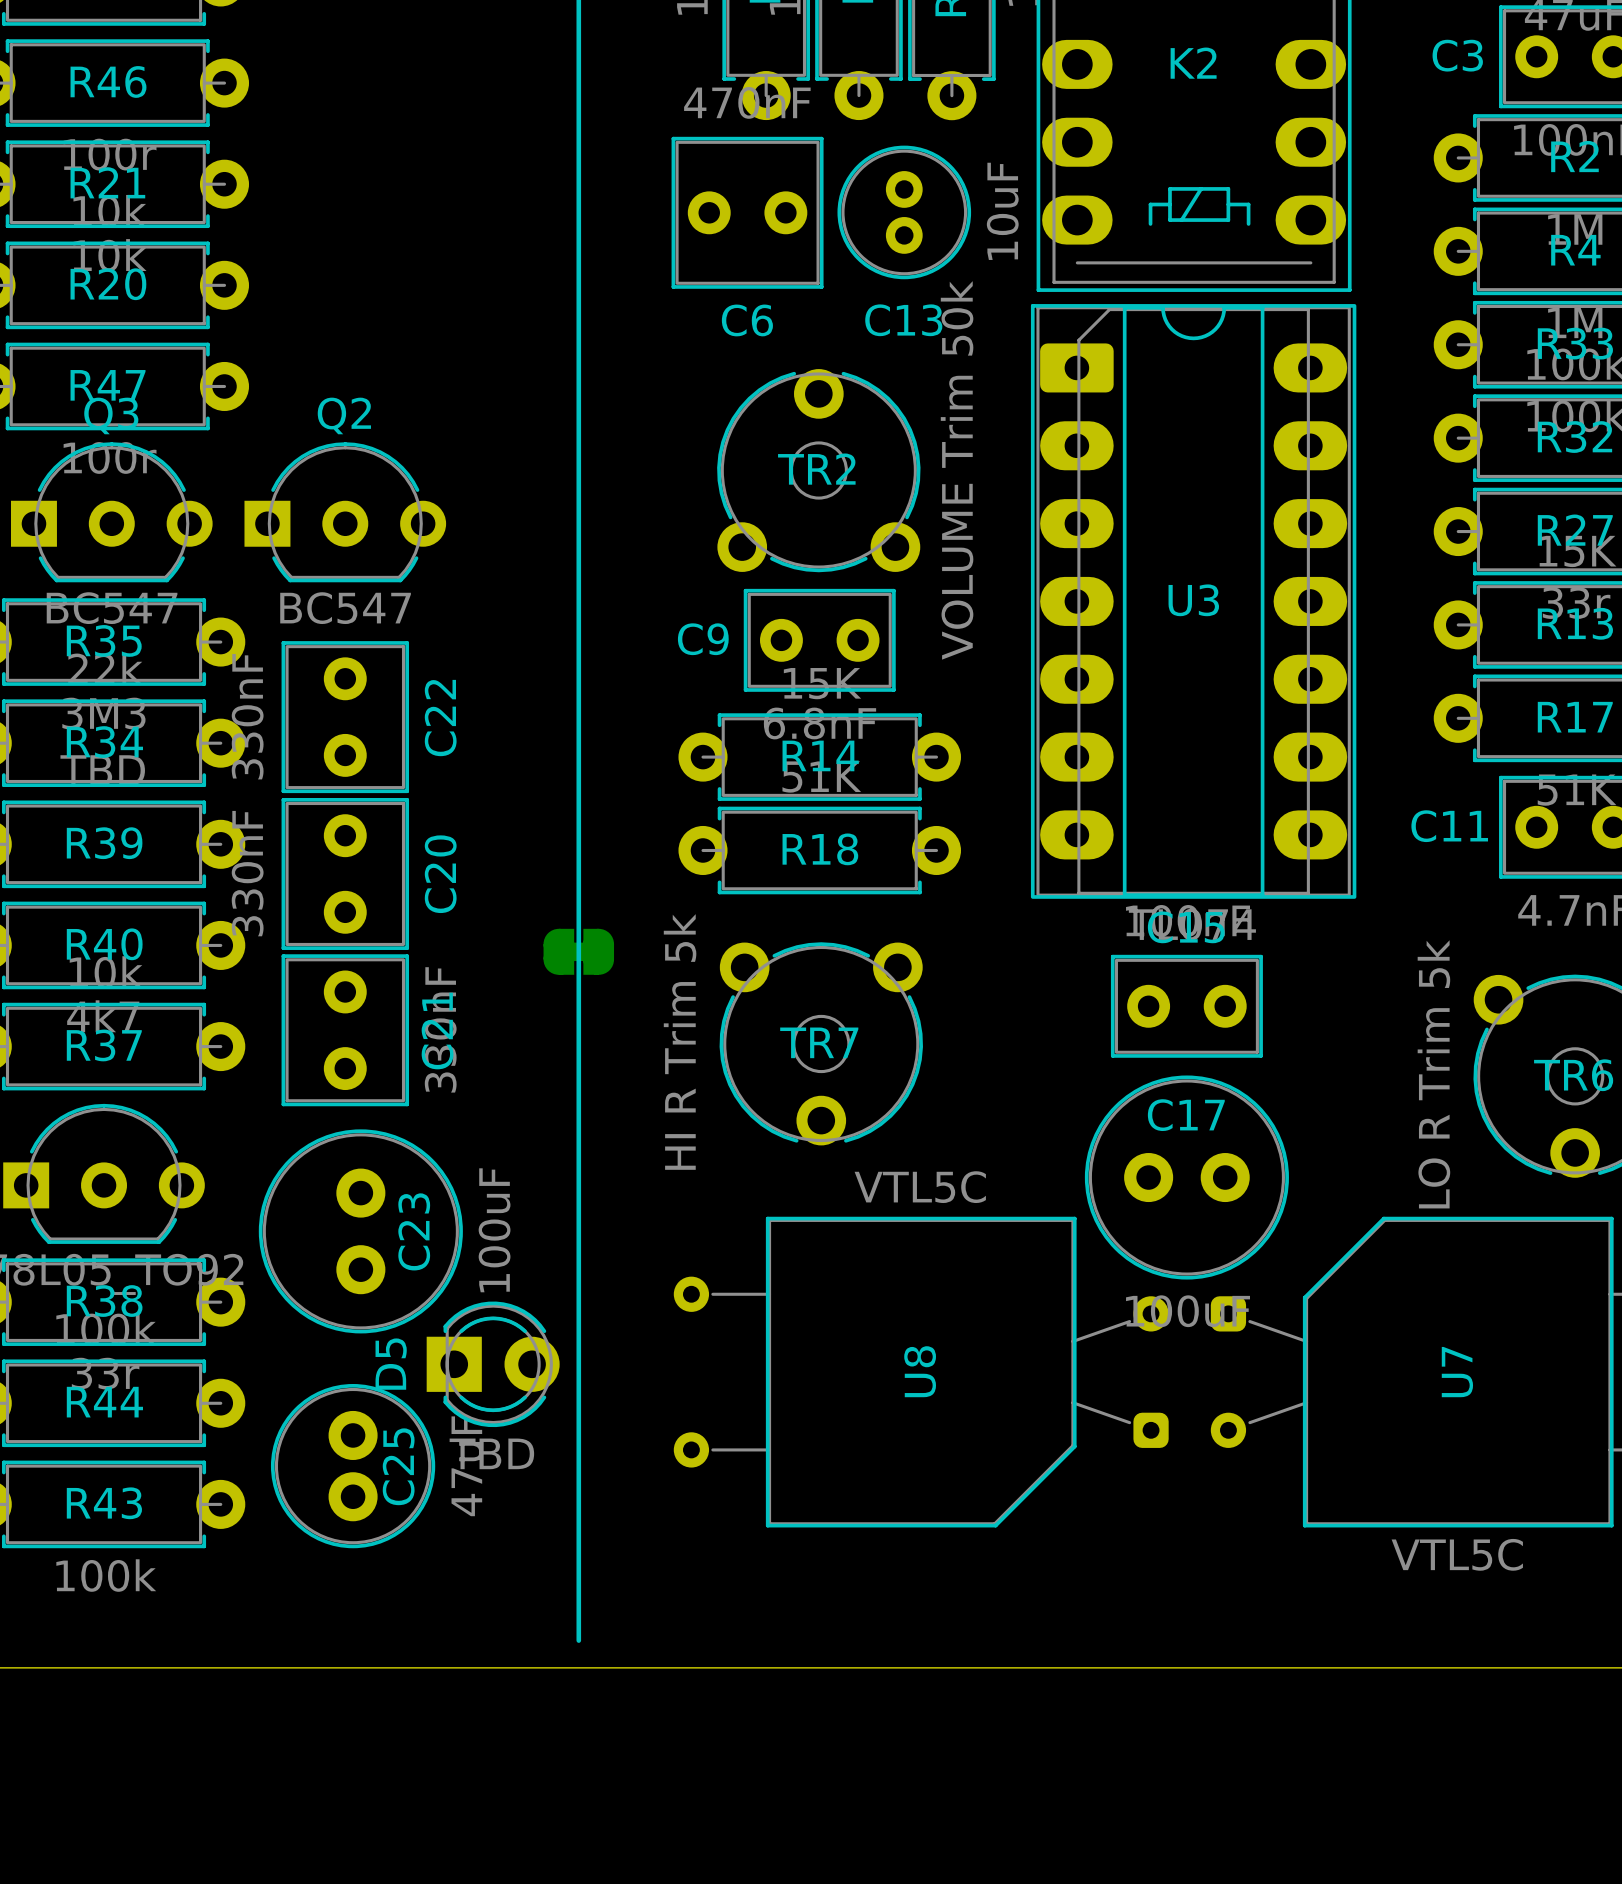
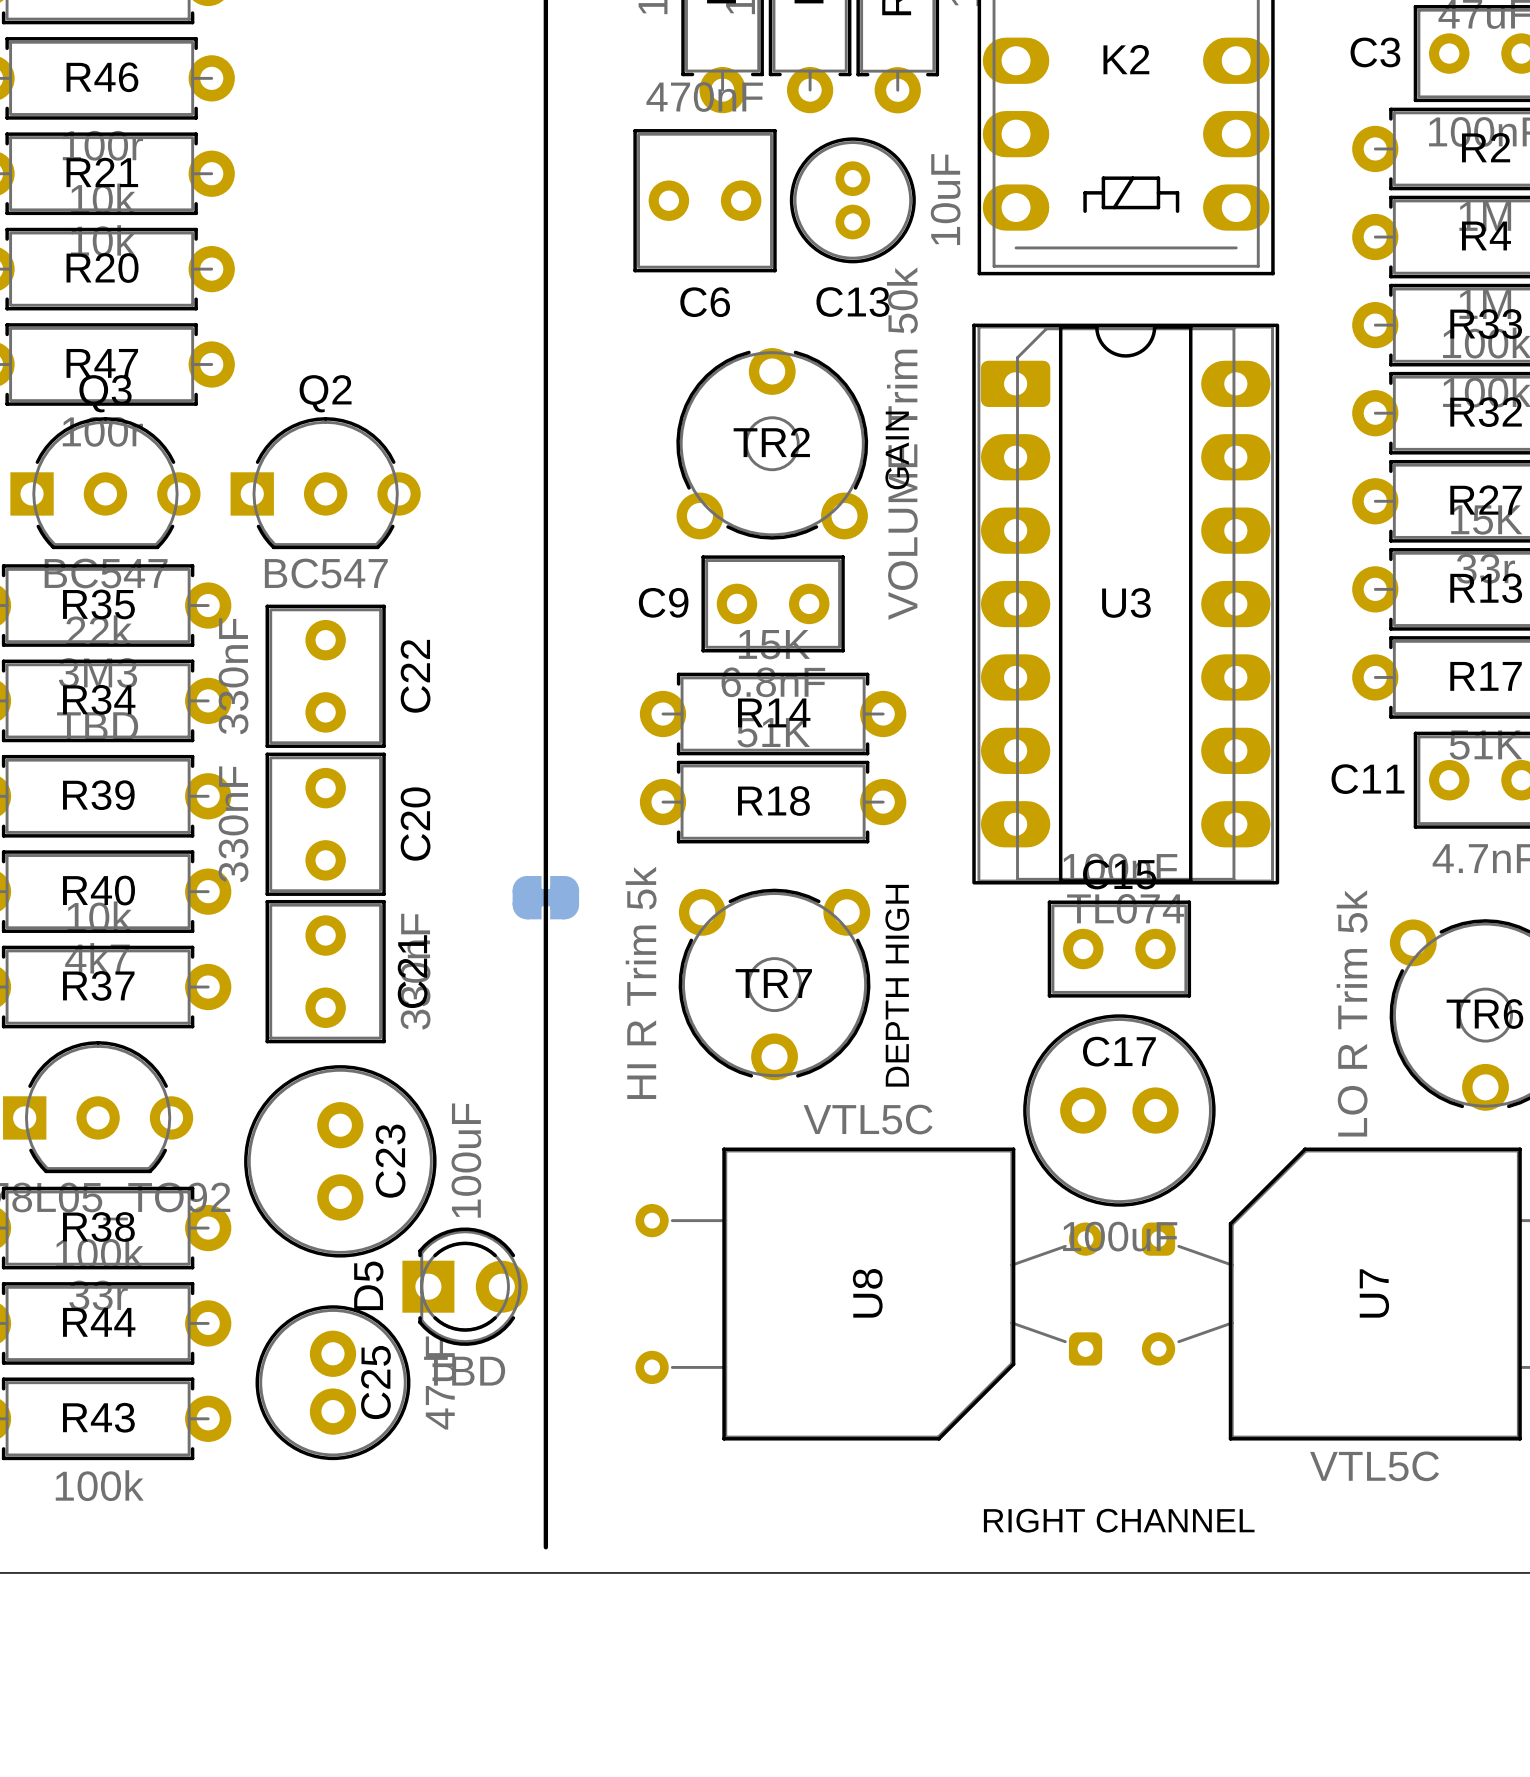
text: none -> GAIN (897, 450)
U3 position: (1193, 601) -> (1125, 604)
text: none -> DEPTH HIGH (897, 985)
text: none -> RIGHT CHANNEL (1119, 1520)

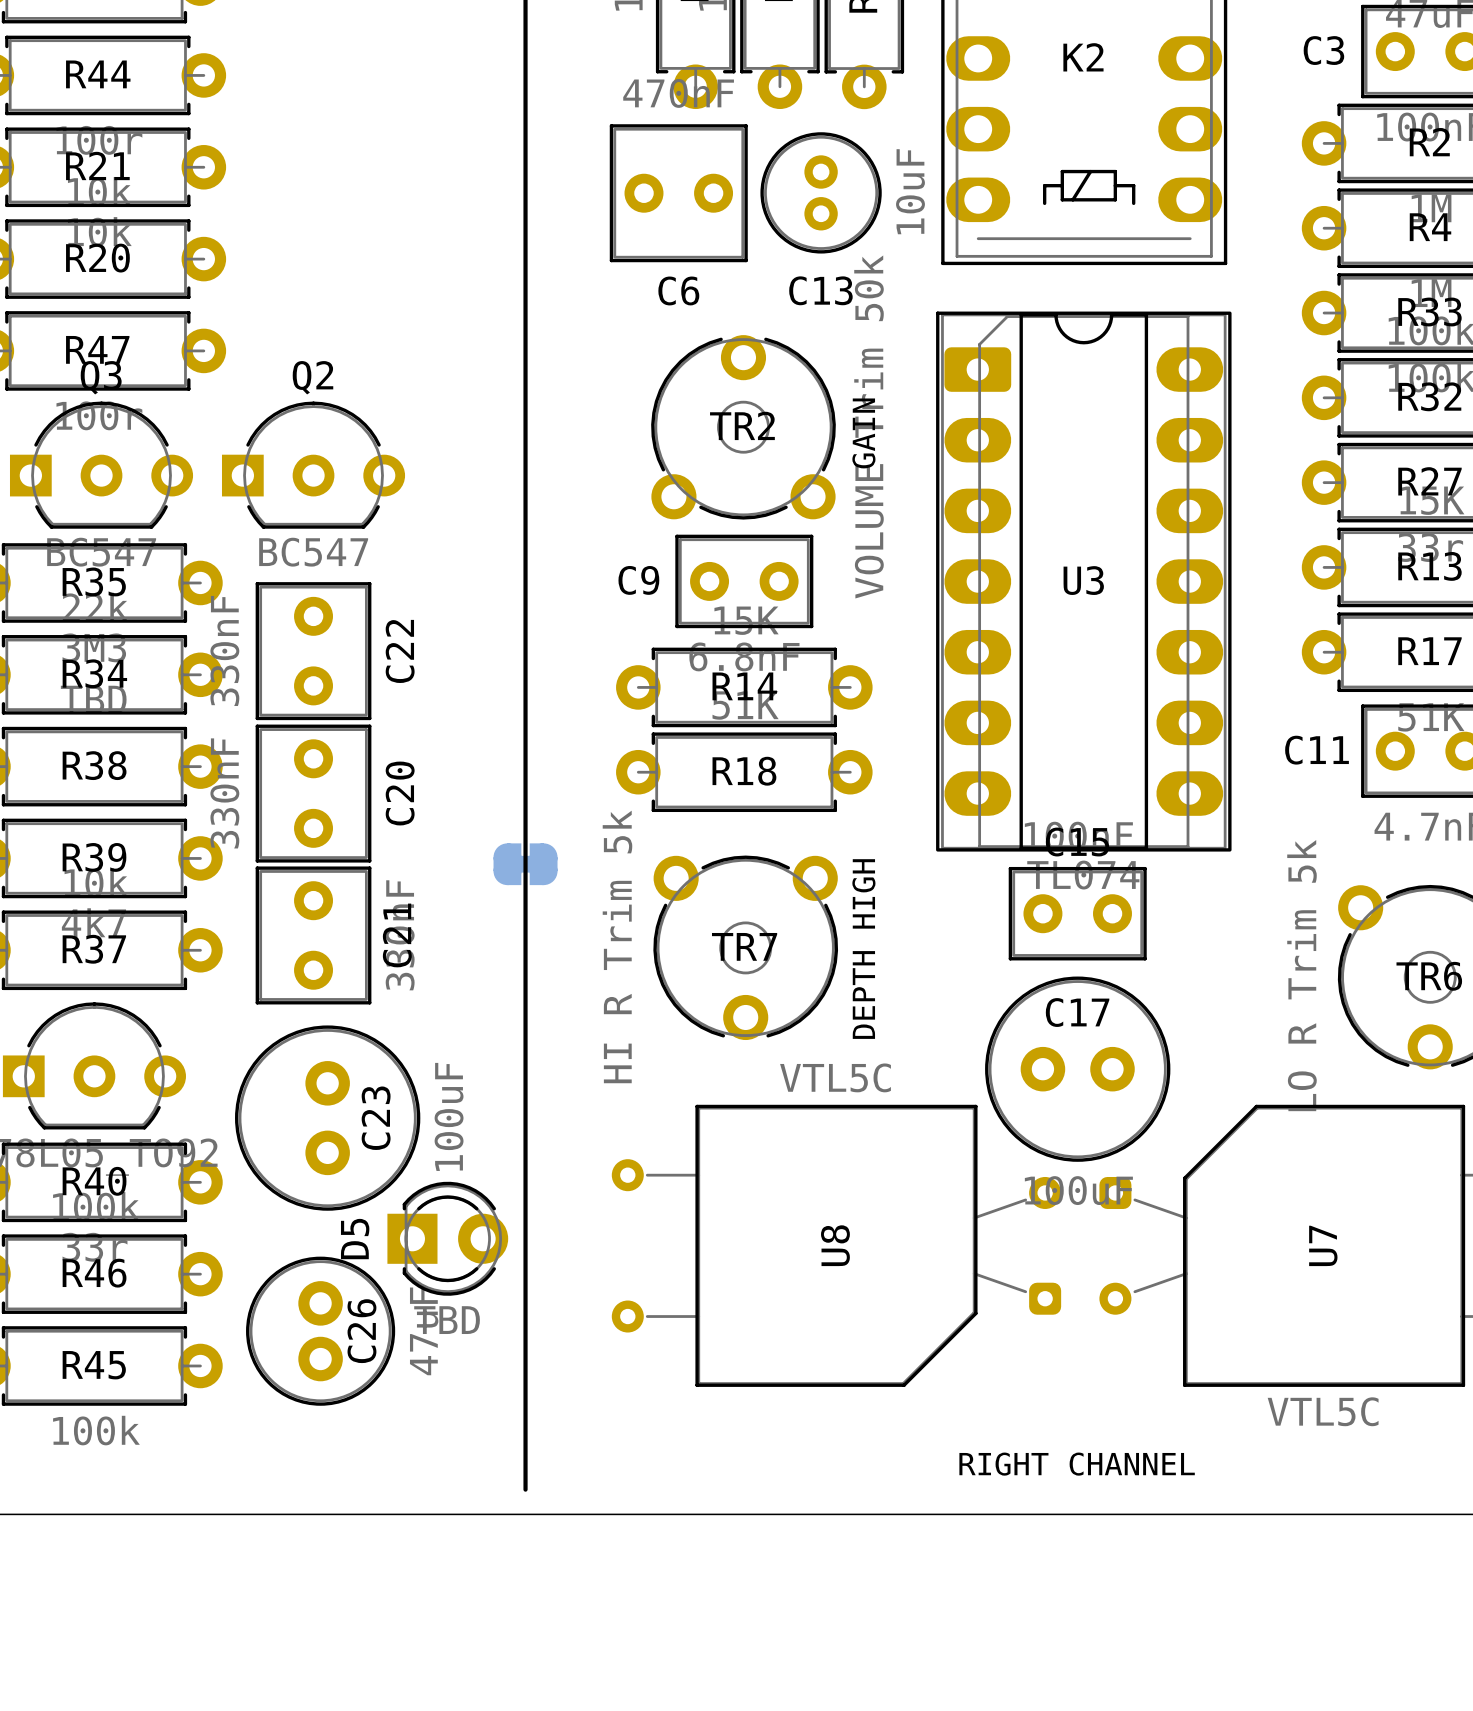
R46 name: R46 (102, 77) -> R44 (98, 74)
R39 name: R39 (98, 795) -> R38 (94, 765)
R40 name: R40 (99, 890) -> R39 (94, 857)
R38 name: R38 (98, 1226) -> R40 (94, 1181)
R44 name: R44 (99, 1322) -> R46 (94, 1273)
C25 name: C25 (375, 1382) -> C26 (361, 1331)
R43 name: R43 (98, 1417) -> R45 (94, 1365)

